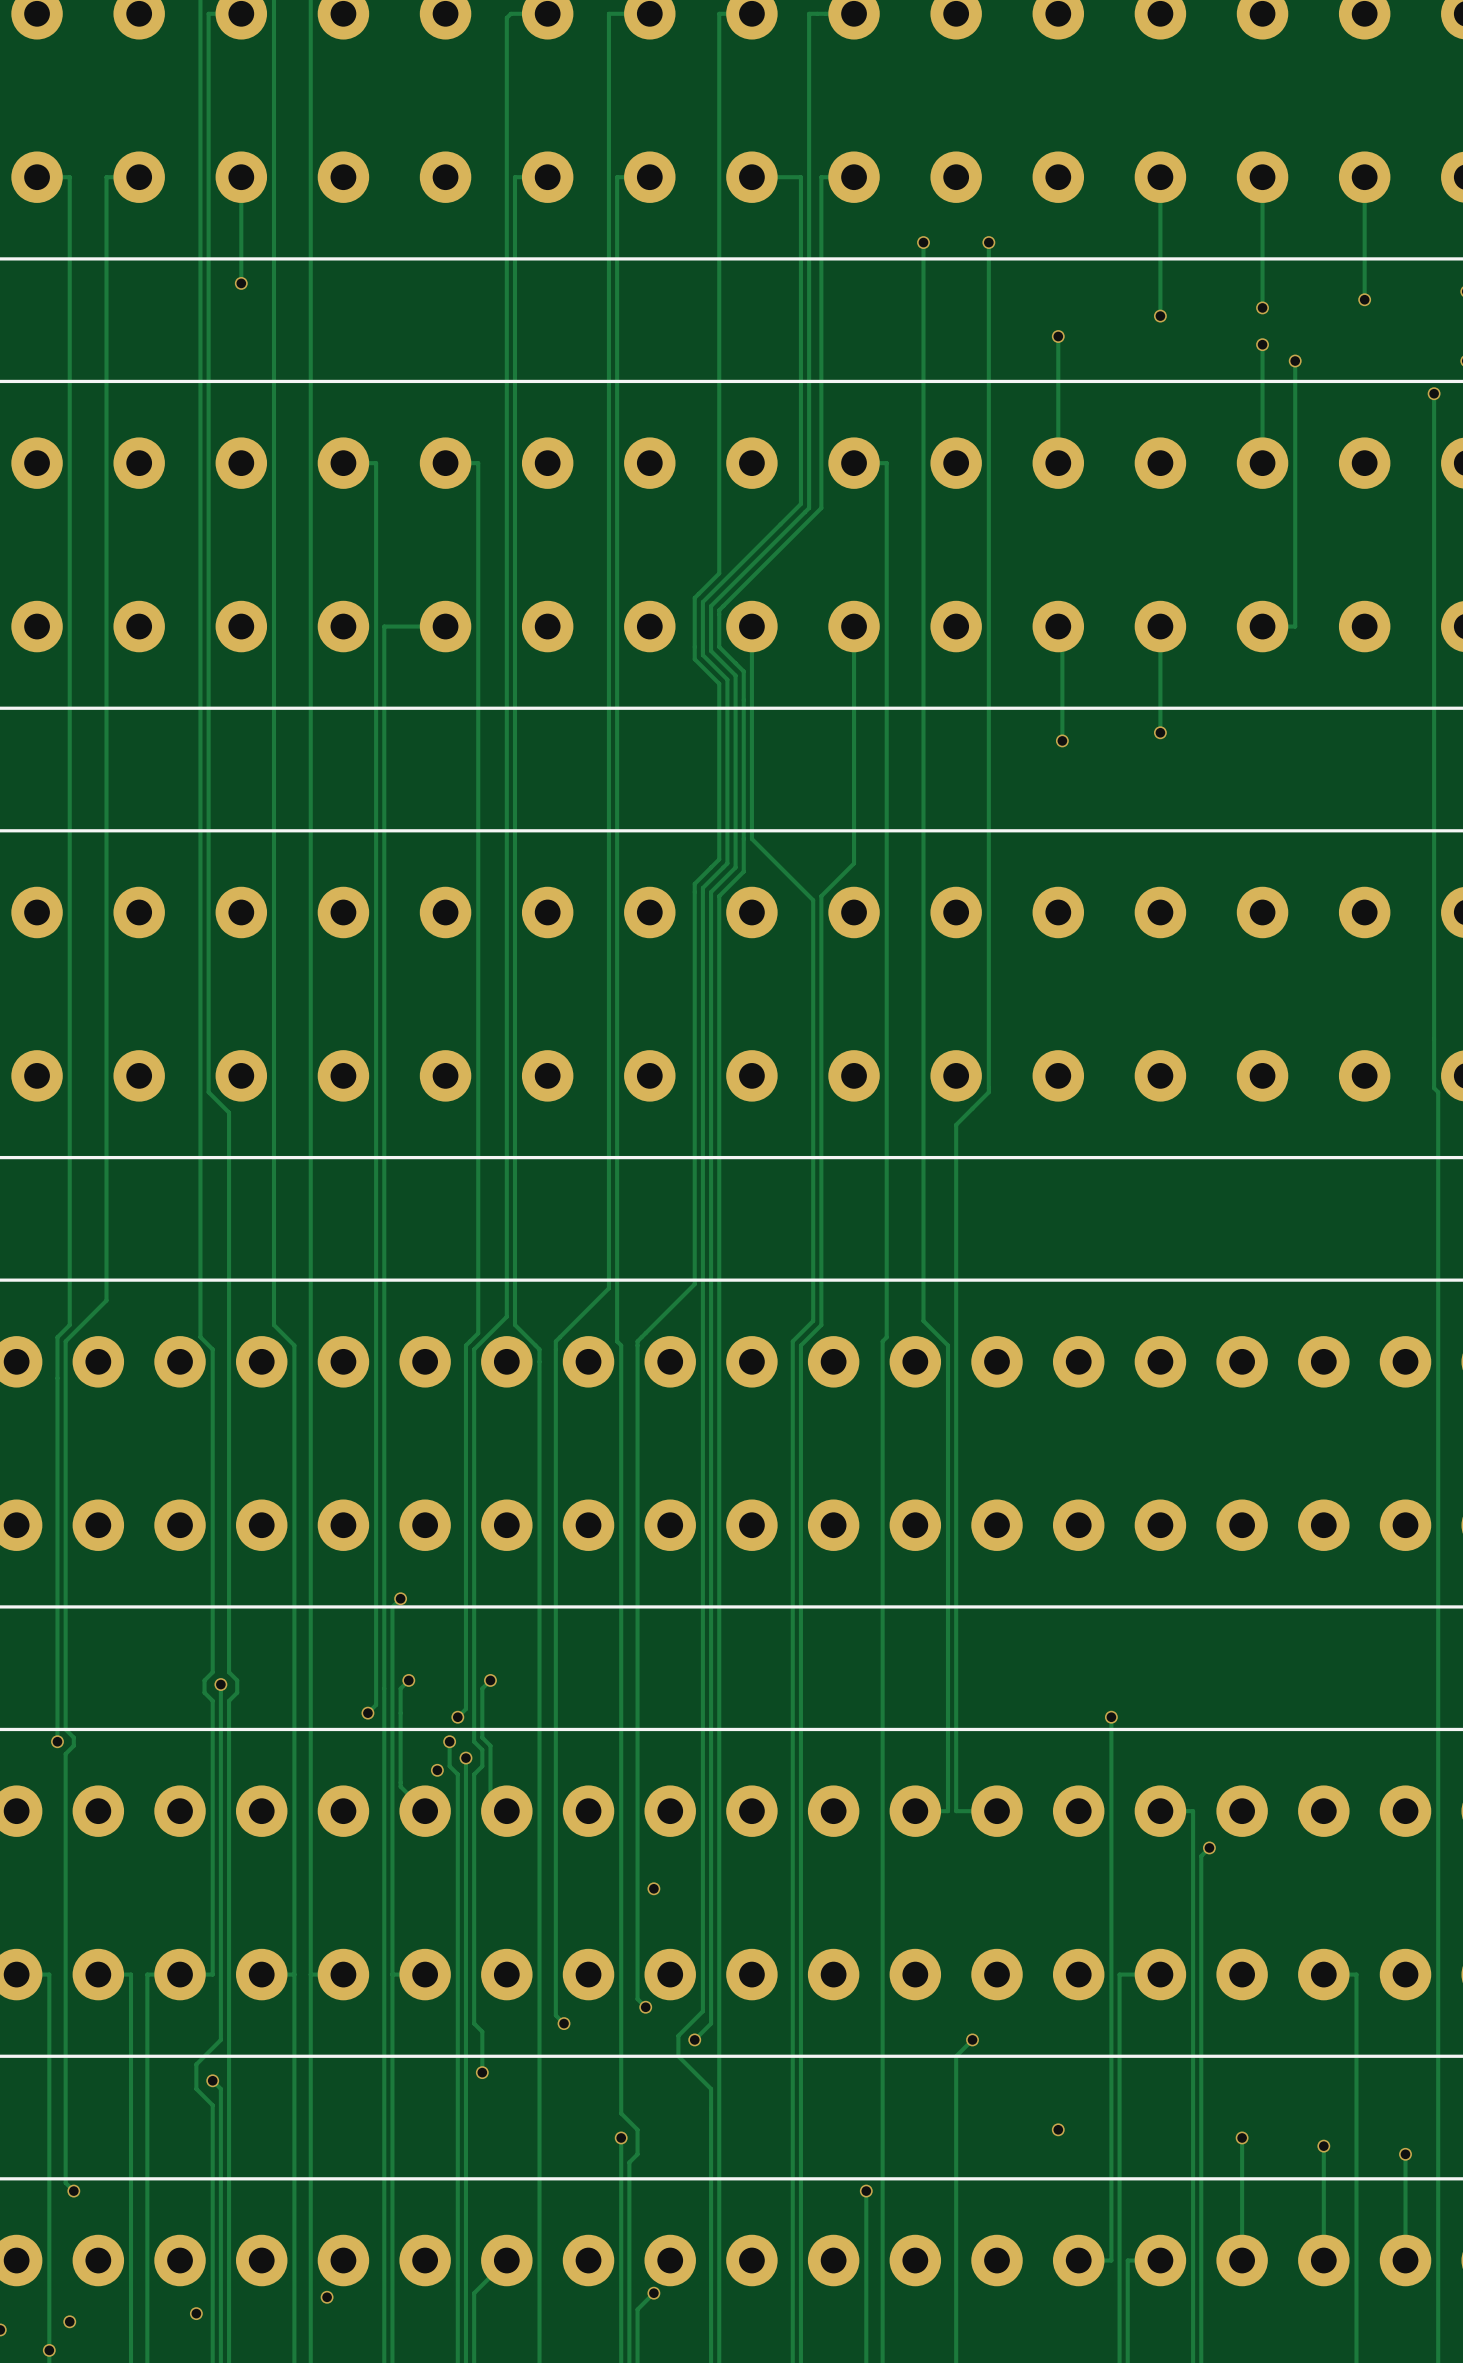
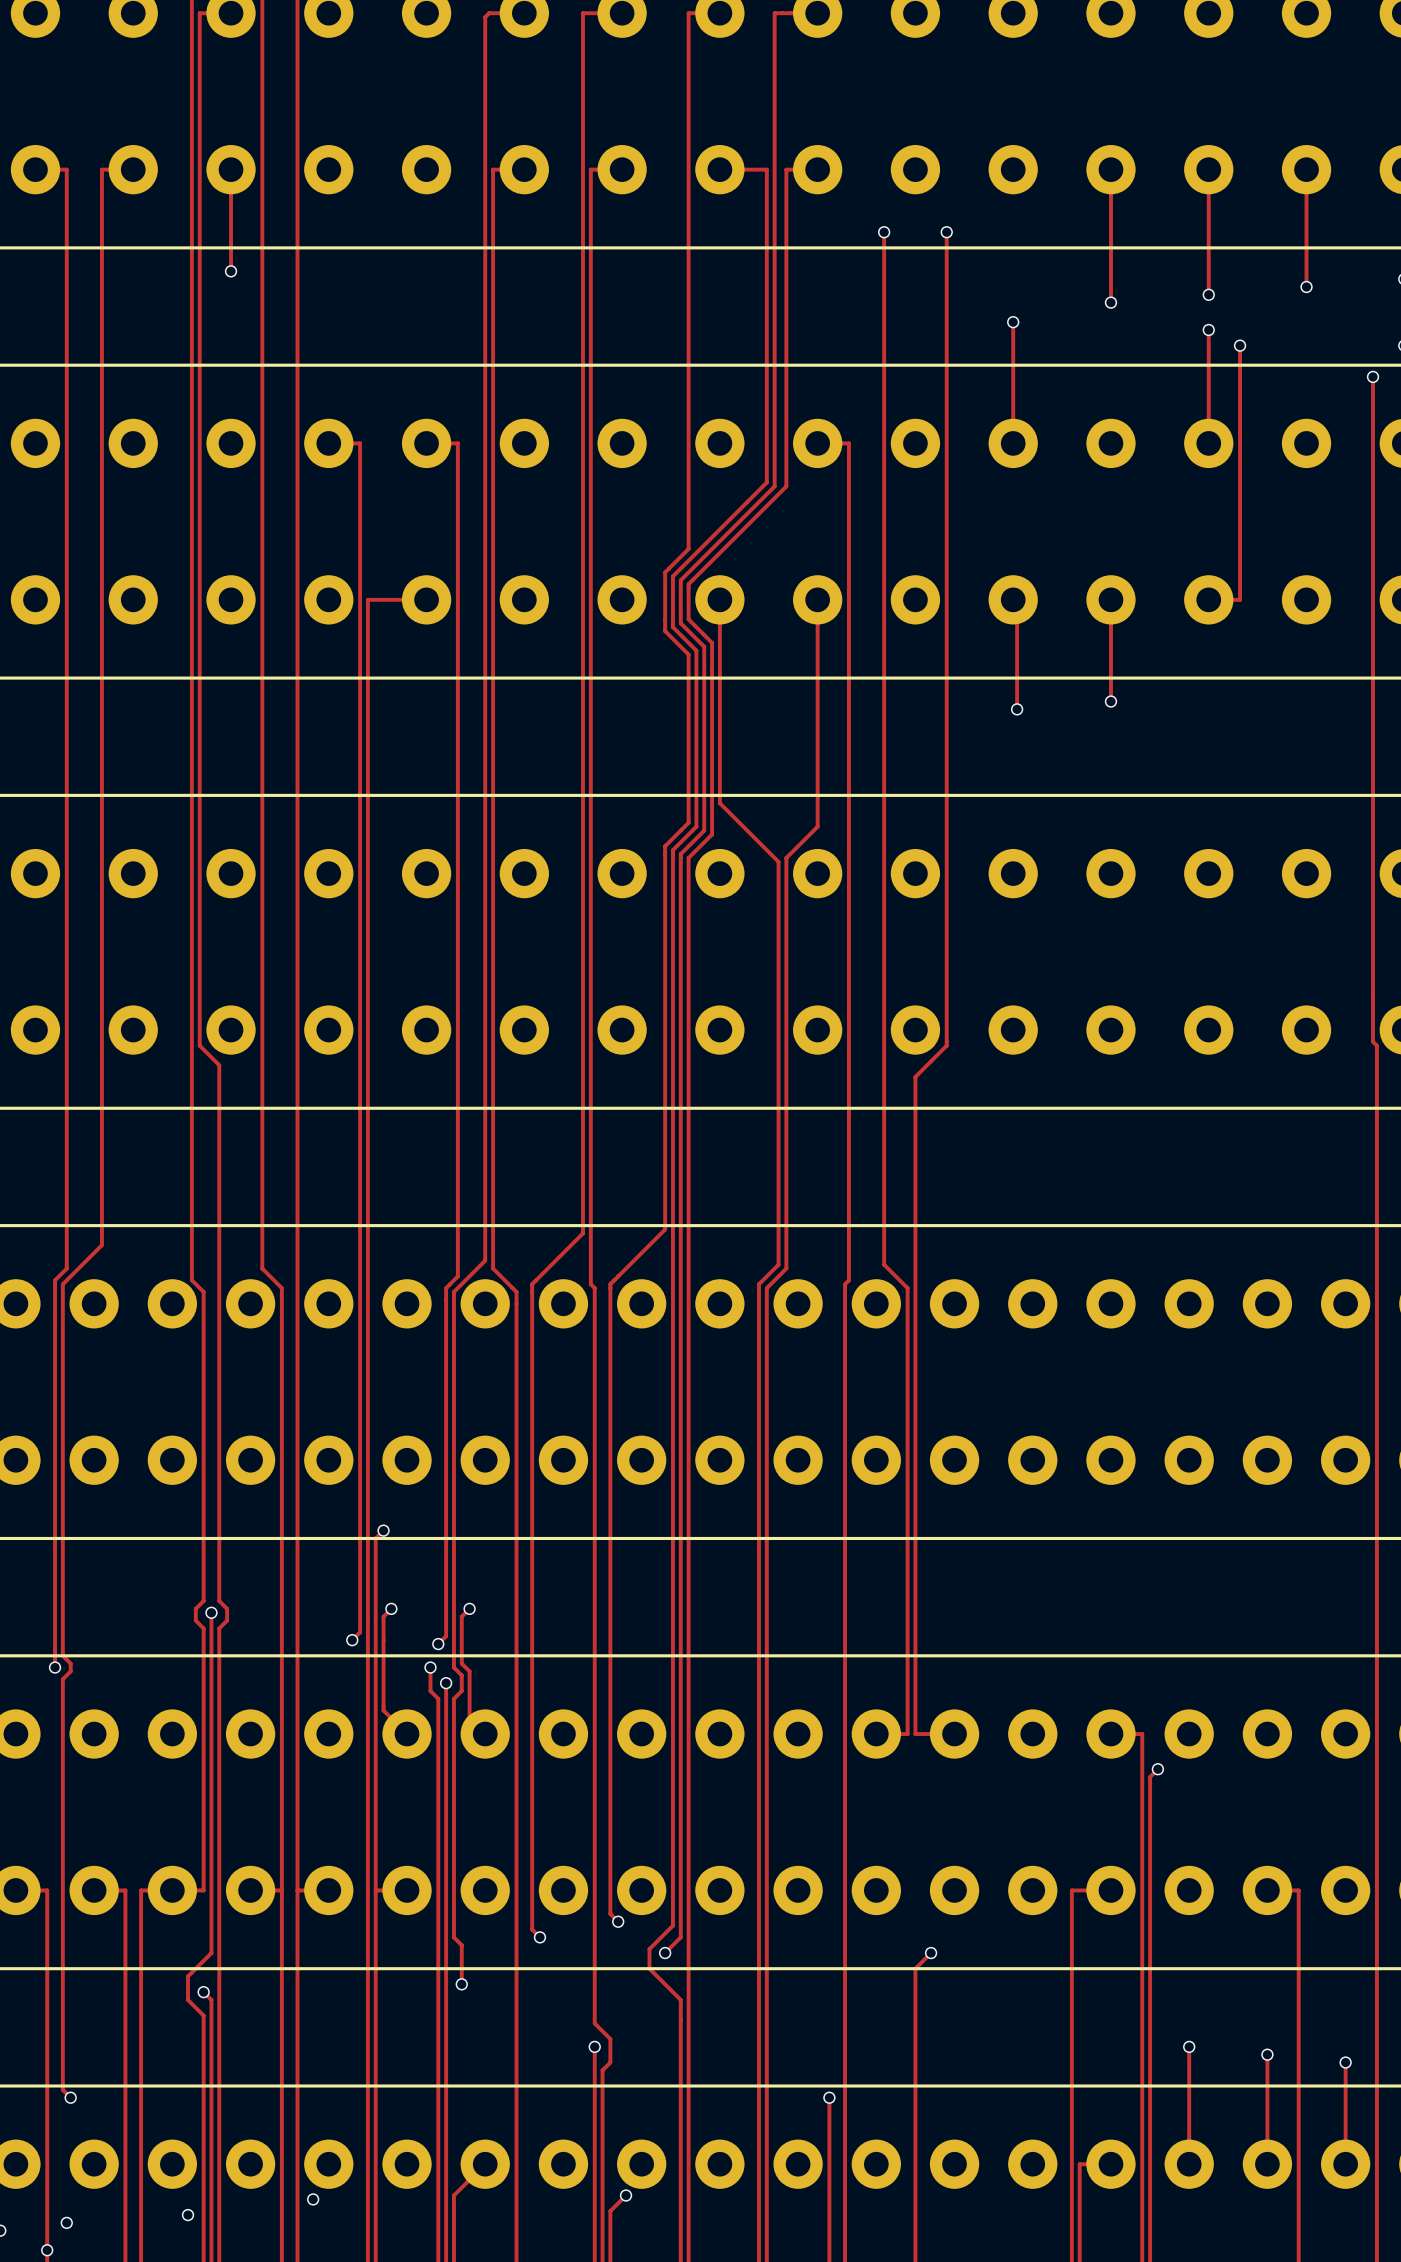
track: (1111, 1717) (1111, 2260) (1078, 2260) -> none
via: (1111, 1717) -> none
via: (437, 1770) -> none
via: (653, 1888) -> none
via: (1058, 2129) -> none

